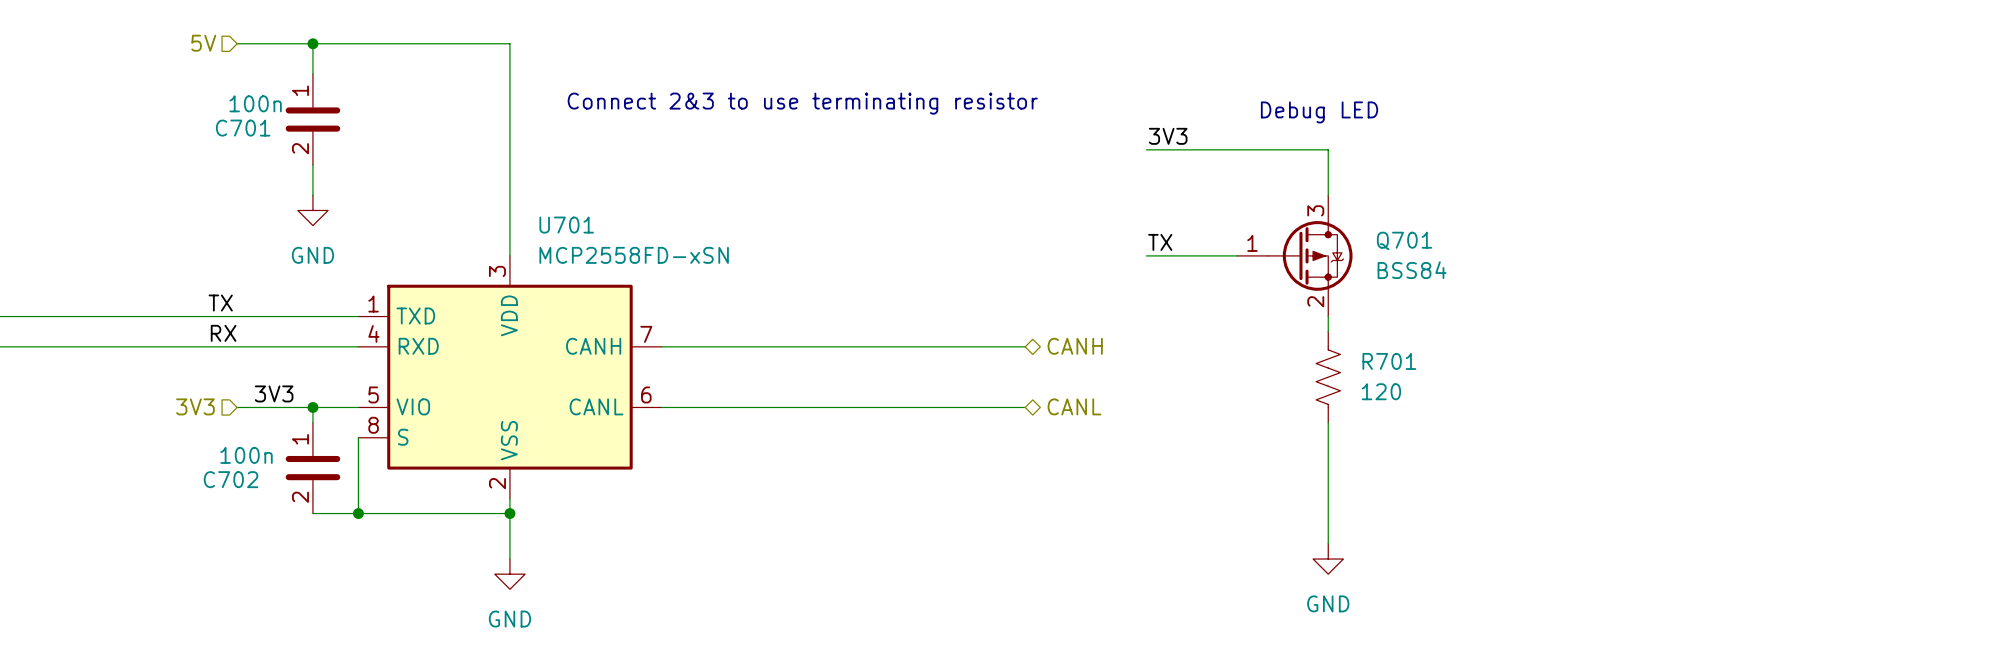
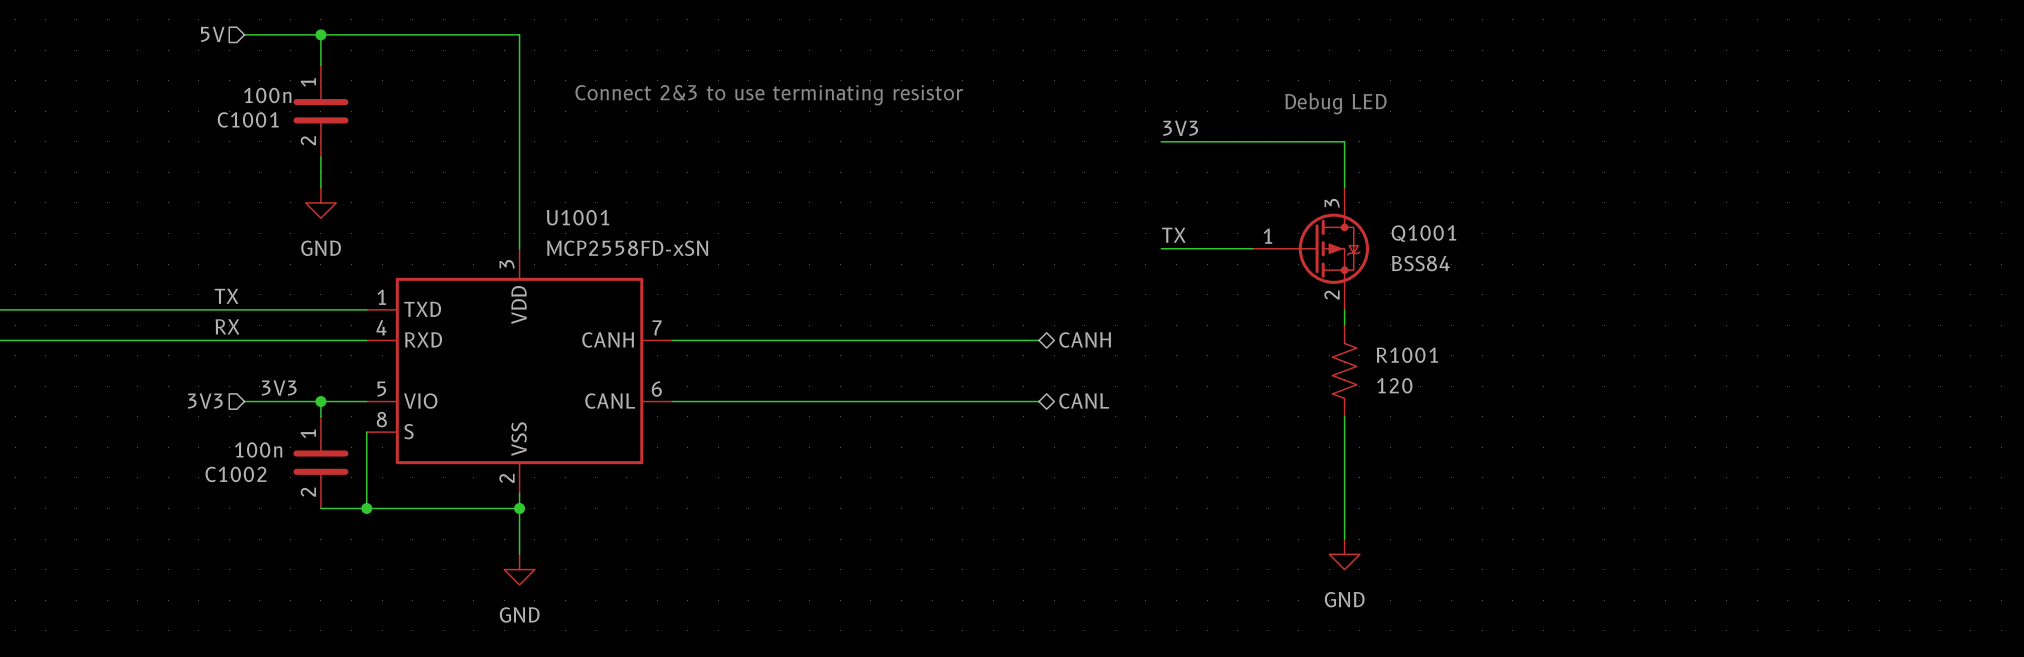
C701 name: C701 (243, 128) -> C1001 (248, 119)
U701 name: U701 (566, 225) -> U1001 (578, 217)
Q701 name: Q701 (1404, 240) -> Q1001 (1423, 233)
R701 name: R701 (1389, 361) -> R1001 (1407, 355)
C702 name: C702 (231, 479) -> C1002 (236, 474)

